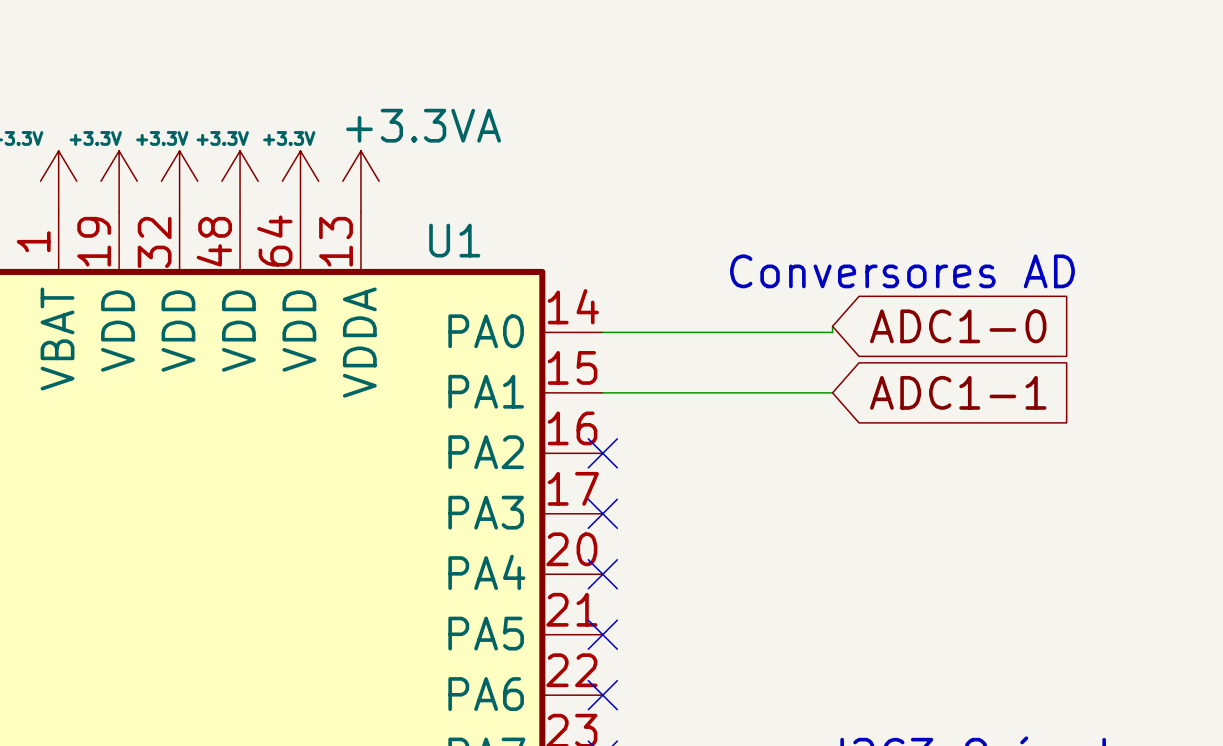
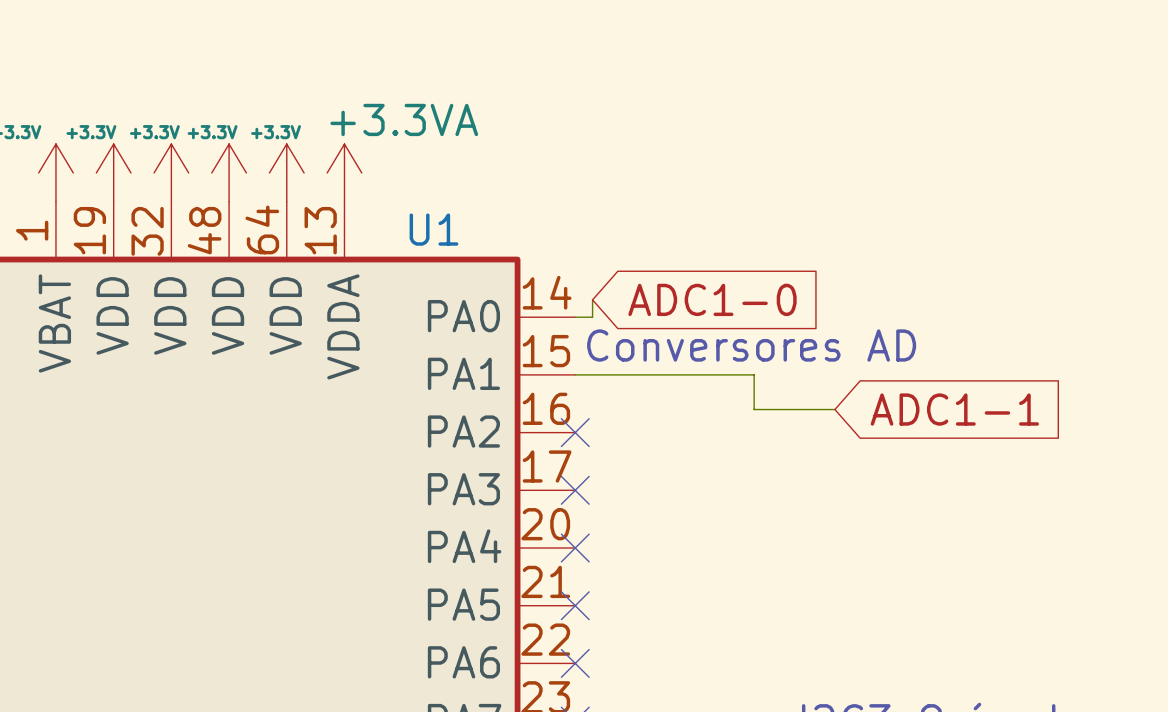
text position: Conversores AD (902, 271) -> Conversores AD (751, 345)
wire: (832, 326) (832, 332) (620, 332) -> (592, 299) (592, 317)
global label position: ADC1-0 (958, 326) -> ADC1-0 (712, 299)
wire: (790, 392) (832, 392) -> (754, 374) (754, 409) (834, 409)
global label position: ADC1-1 (958, 392) -> ADC1-1 (954, 409)

